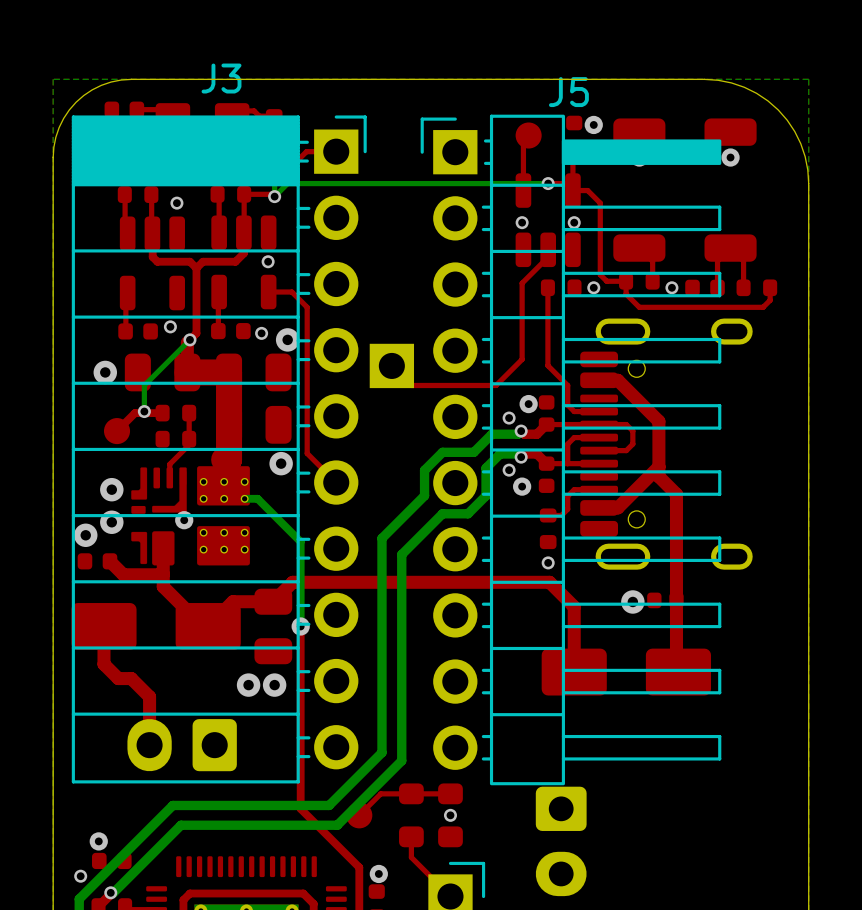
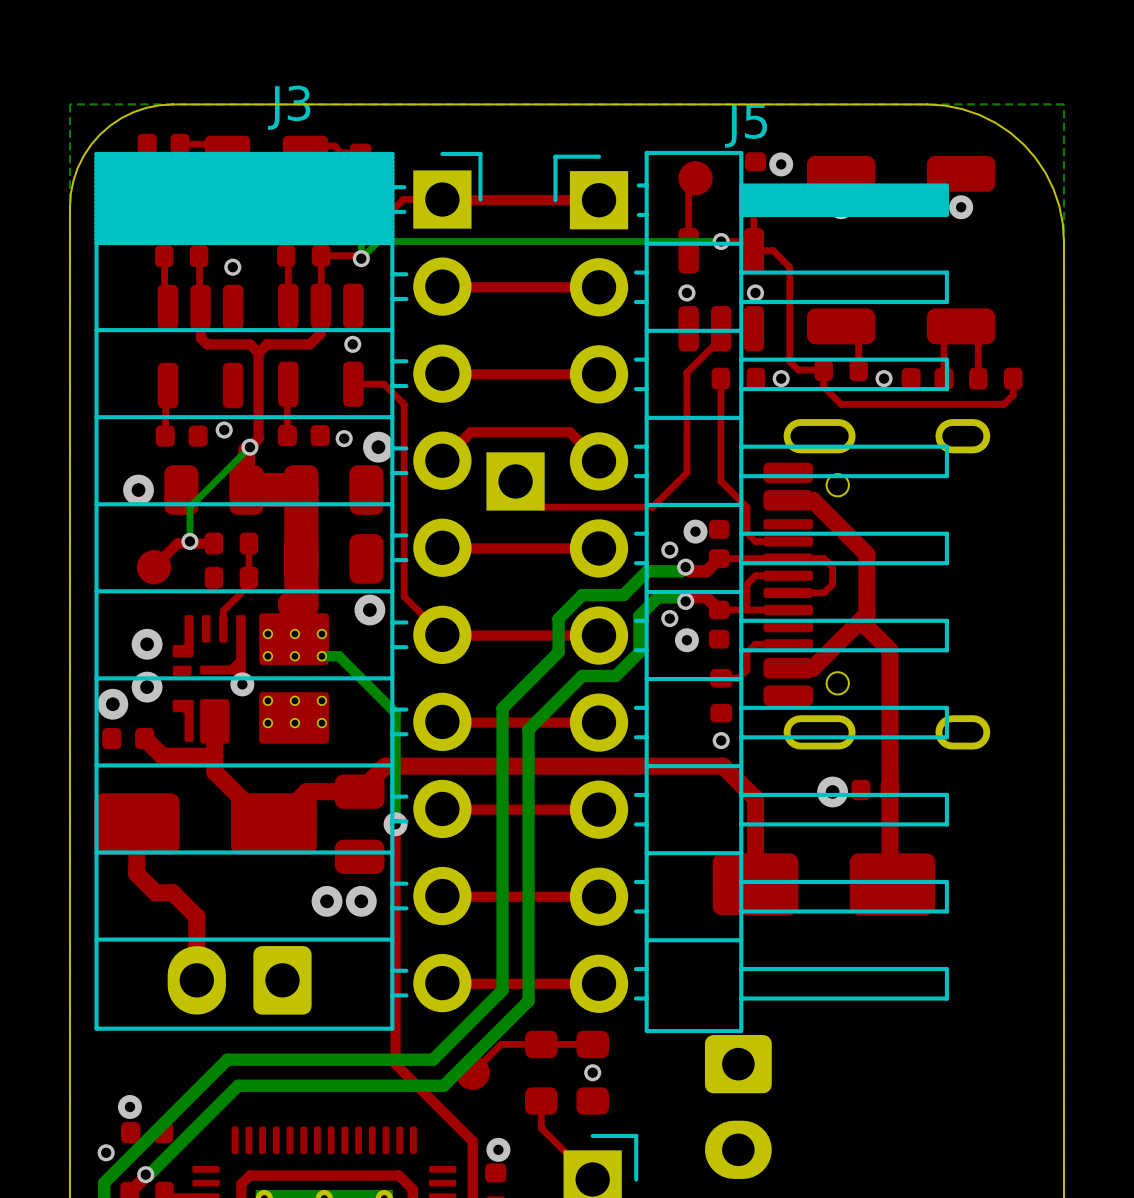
top track: none -> (442, 199) (599, 200)
top track: none -> (442, 286) (599, 287)
top track: none -> (442, 373) (599, 374)
top track: none -> (442, 460) (470, 432) (569, 432) (599, 461)
top track: none -> (442, 547) (599, 548)
top track: none -> (442, 634) (599, 635)
top track: none -> (442, 721) (599, 722)
top track: none -> (442, 808) (599, 809)
top track: none -> (442, 896) (599, 896)
top track: none -> (442, 983) (599, 983)

